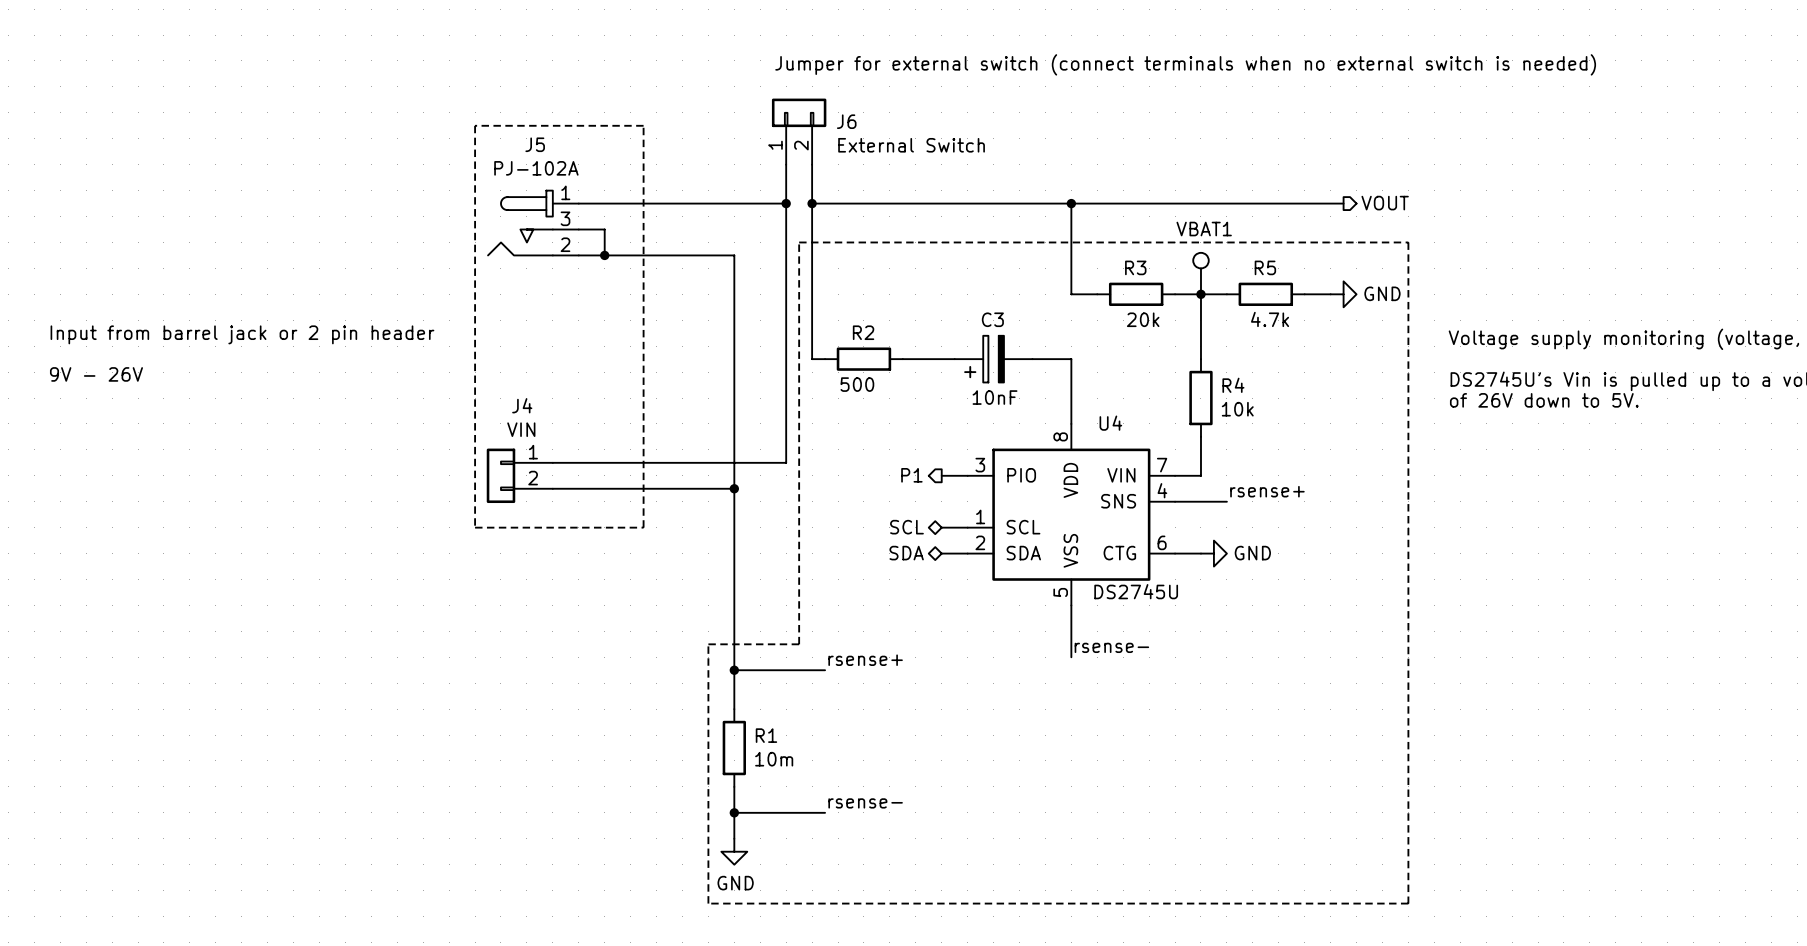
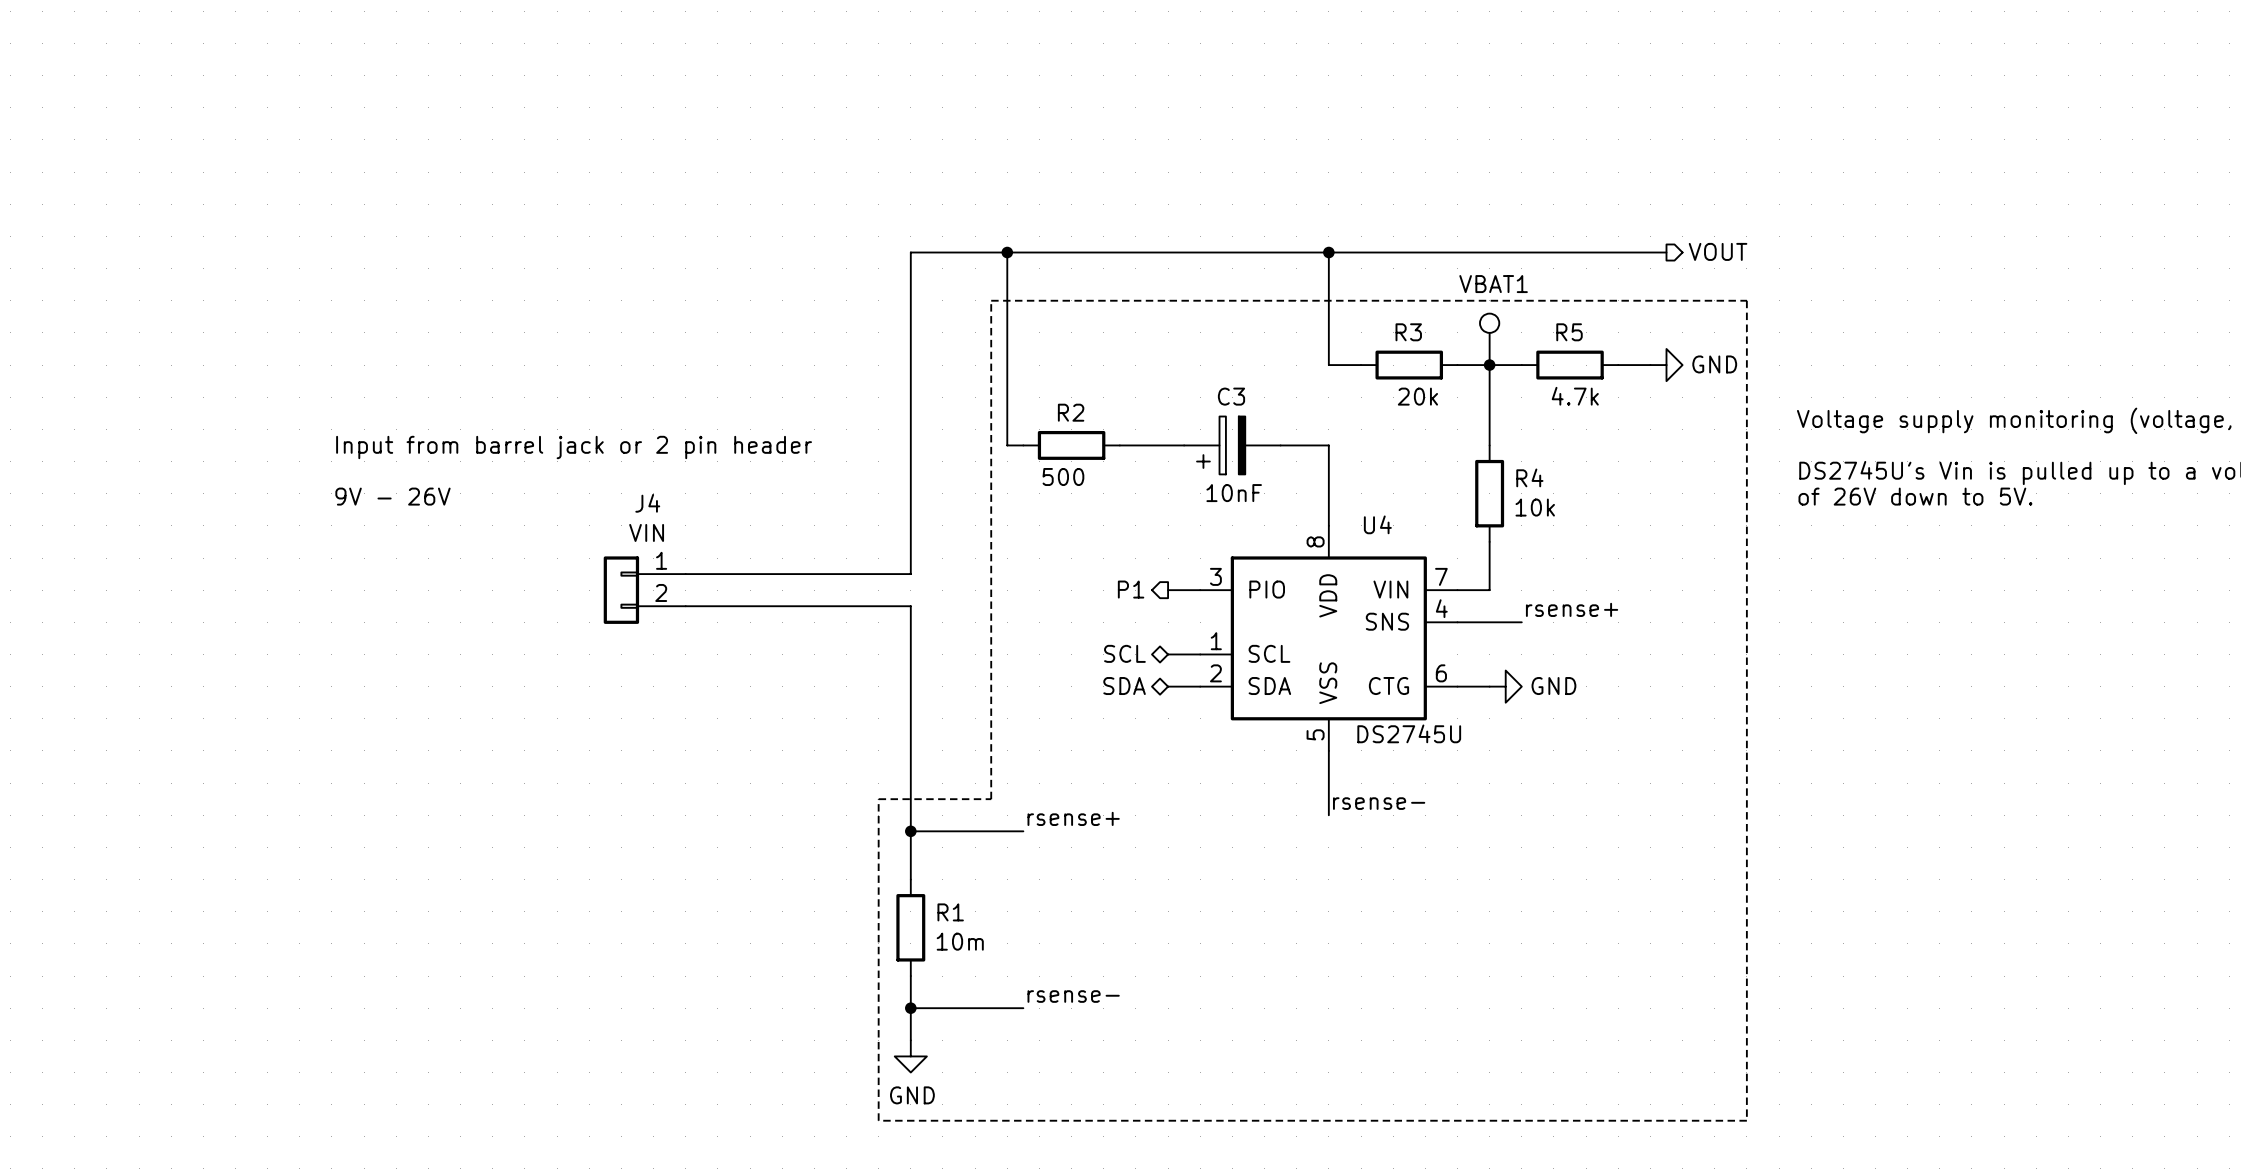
text: Jumper for external switch (connect terminals when no external switch is needed) (1185, 64) -> none
line: (475, 125) (475, 527) (643, 527) (643, 125) (475, 125) -> none
J6: External Switch (799, 131) -> none
wire: (786, 164) (786, 462) (734, 462) (734, 488) -> none
wire: (812, 164) (812, 203) -> (975, 252) (1007, 252)
wire: (578, 203) (734, 203) -> (910, 316) (910, 252)
junction: (786, 203) -> none
J5: PJ-102A (533, 223) -> none
wire: (578, 229) (604, 229) (604, 255) -> none
wire: (578, 255) (734, 255) -> none
junction: (604, 255) -> none
text position: Input from barrel jack or 2 pin header (242, 334) -> Input from barrel jack or 2 pin header (574, 447)
text position: 9V - 26V (96, 374) -> 9V - 26V (392, 496)
junction: (734, 488) -> none

